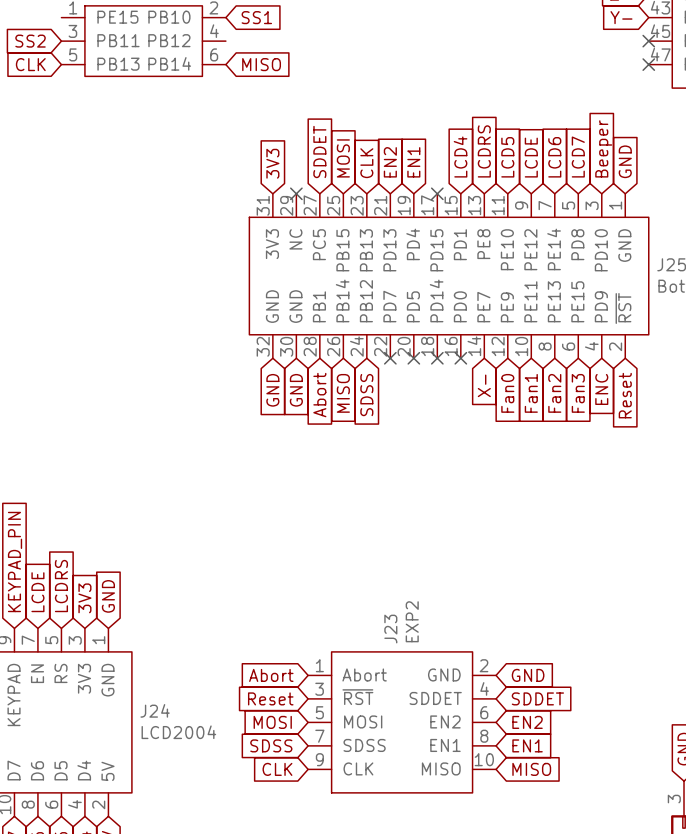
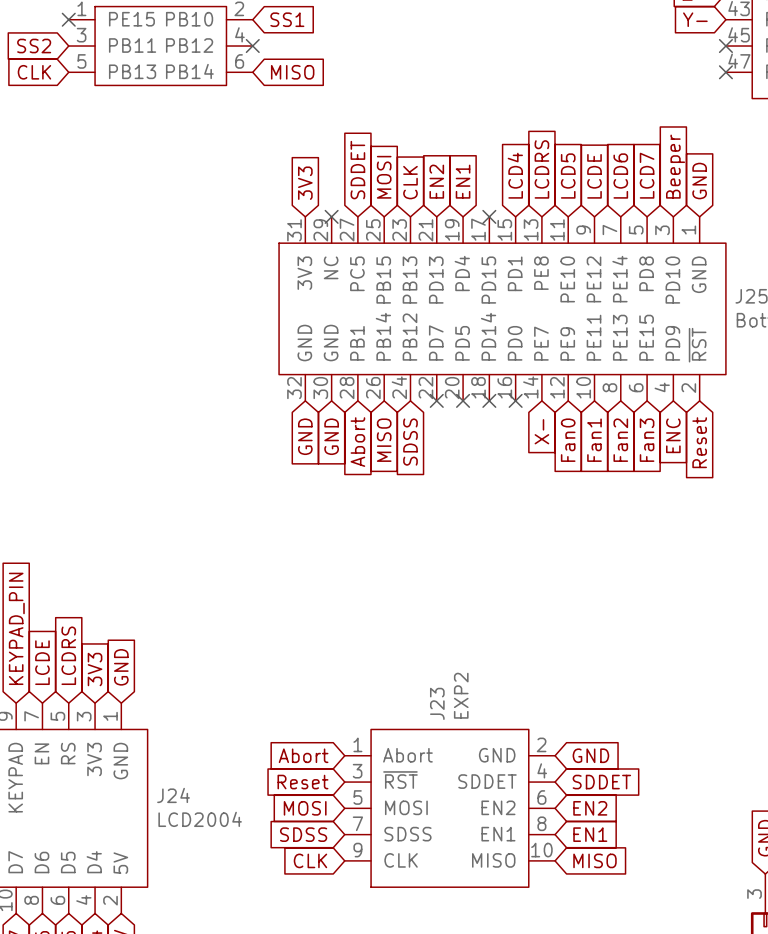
no-connect mark: none -> (68, 19)
no-connect mark: none -> (252, 46)

